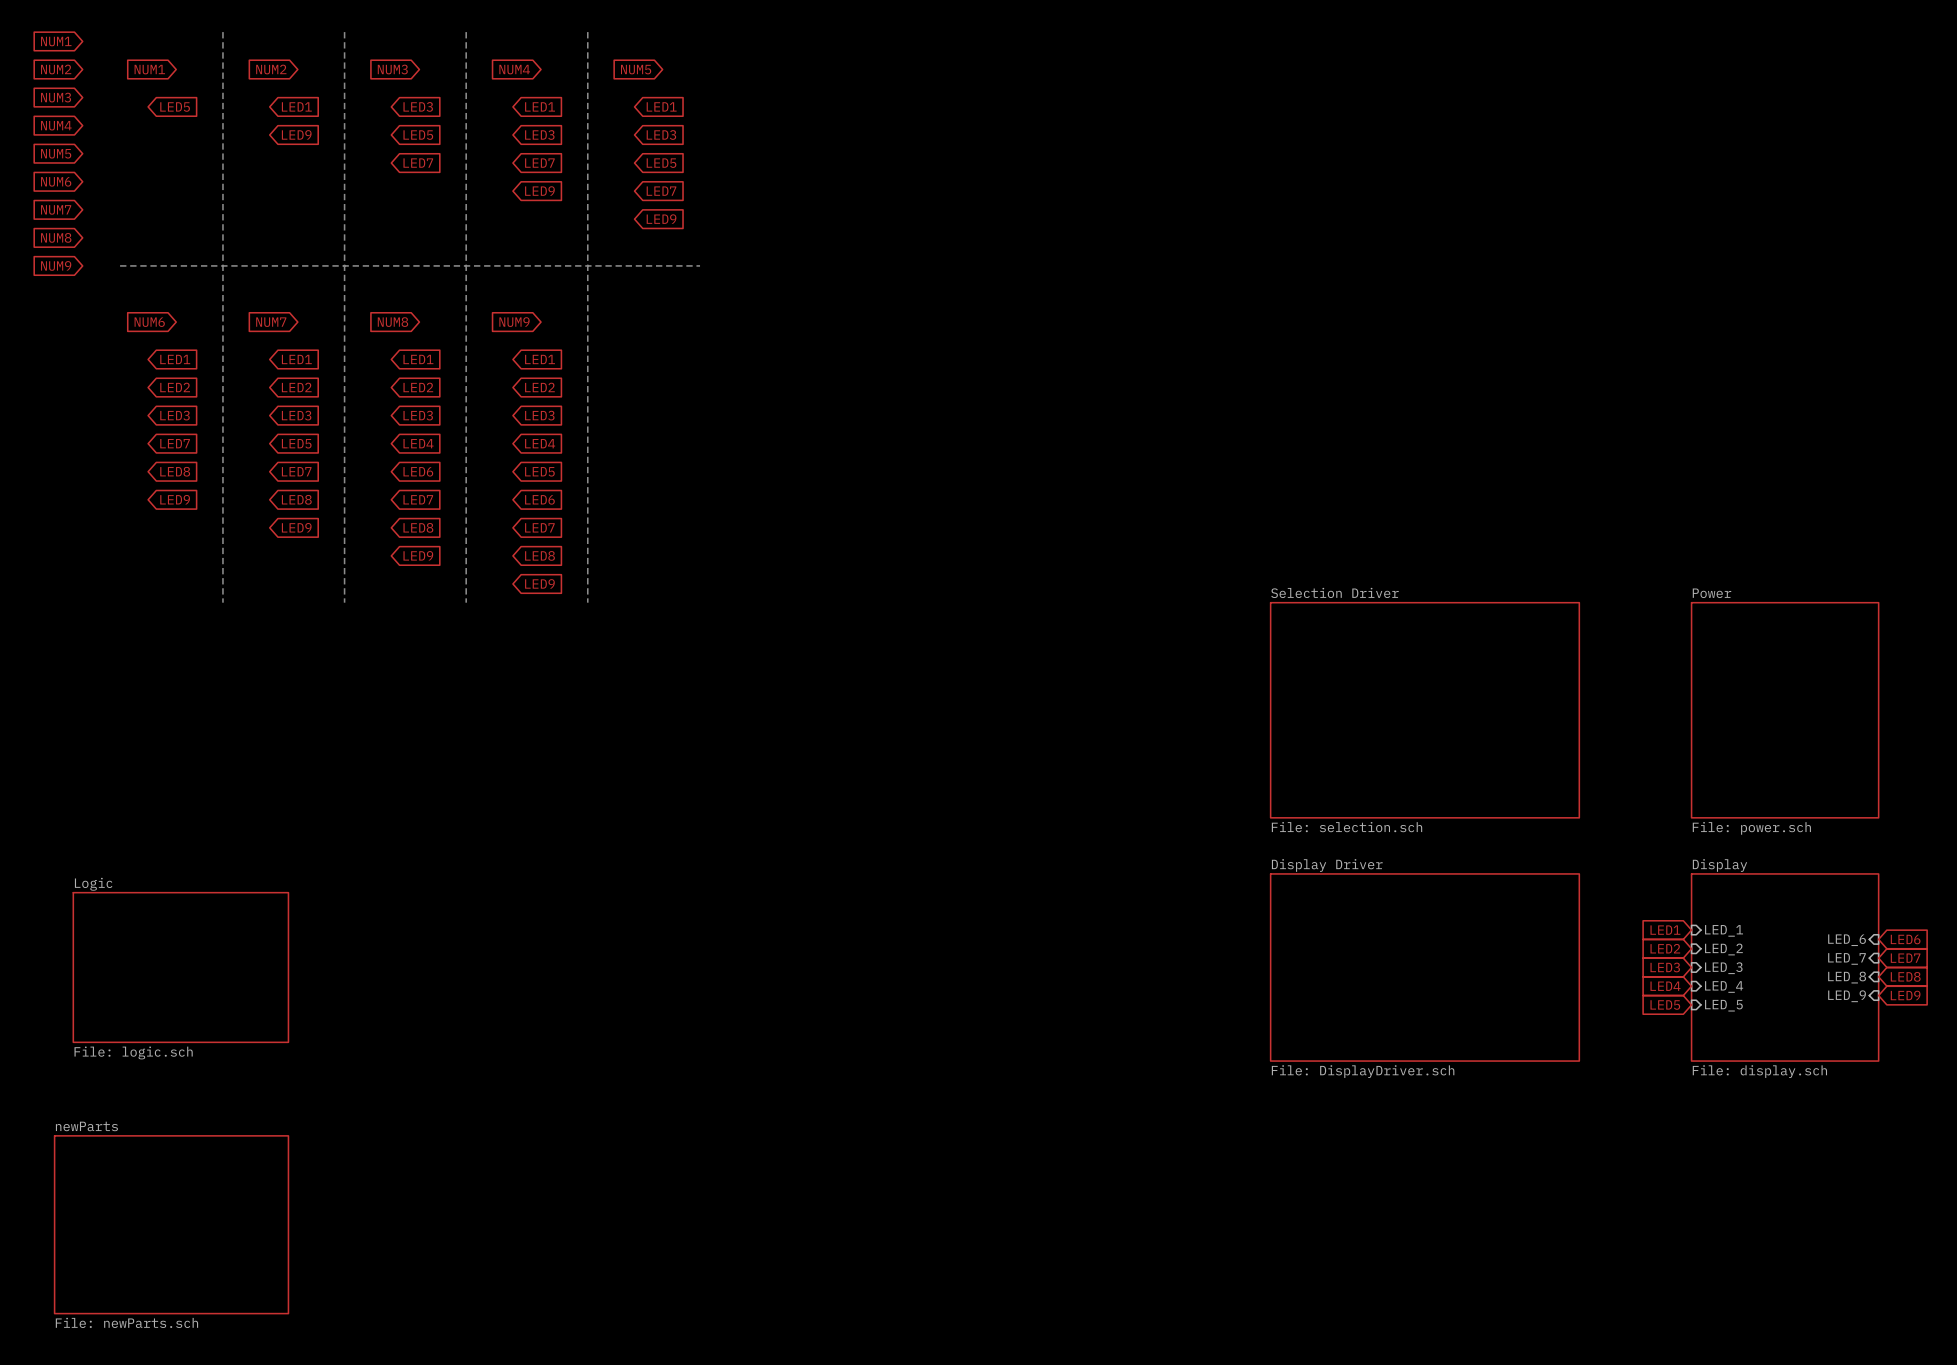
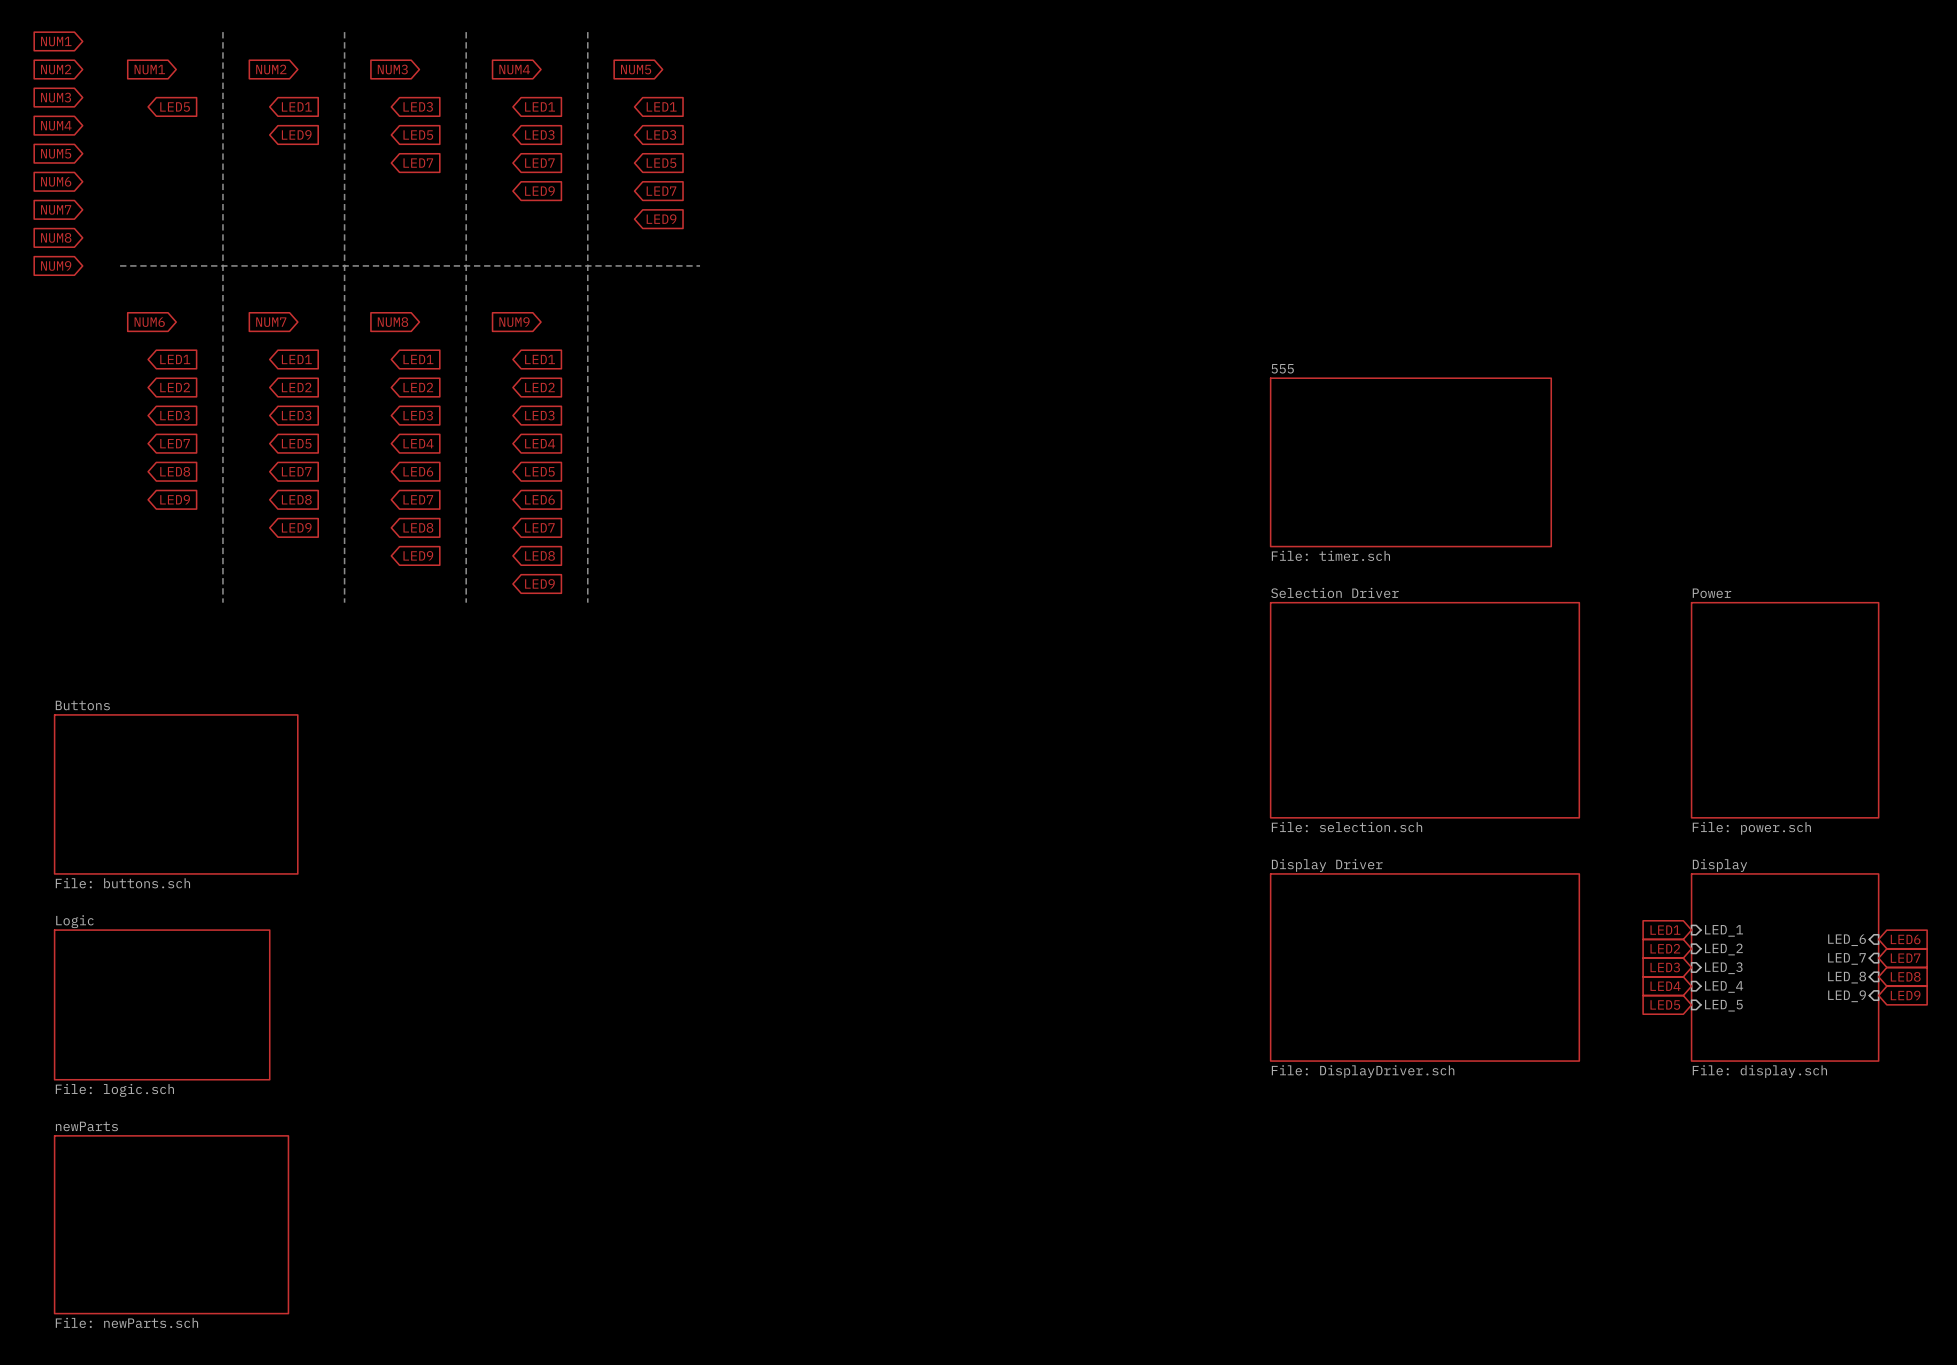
sheet 555: none -> File: timer.sch (1410, 462)
sheet Buttons: none -> File: buttons.sch (176, 794)
sheet Logic position: (180, 967) -> (162, 1004)

